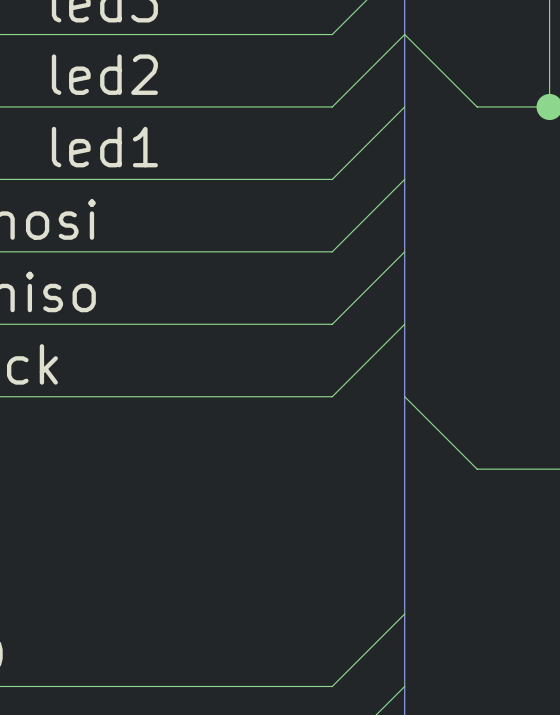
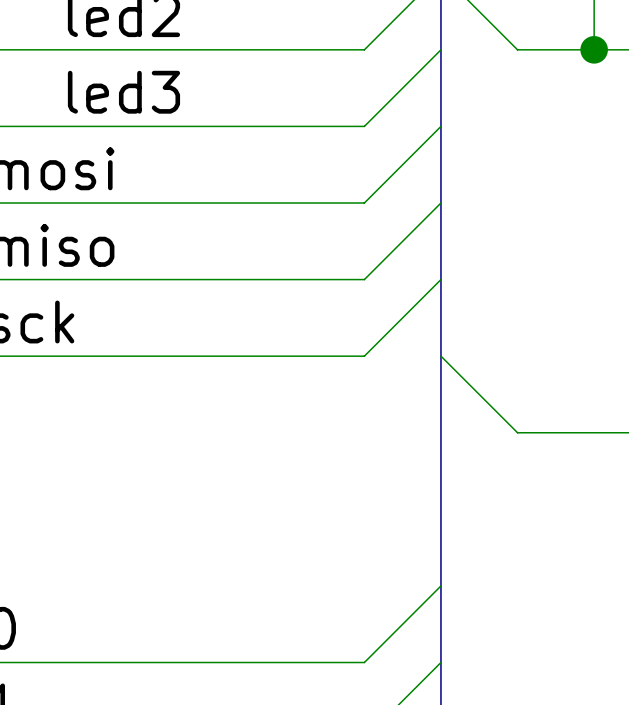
label: led1 (104, 147) -> led3 (123, 92)

